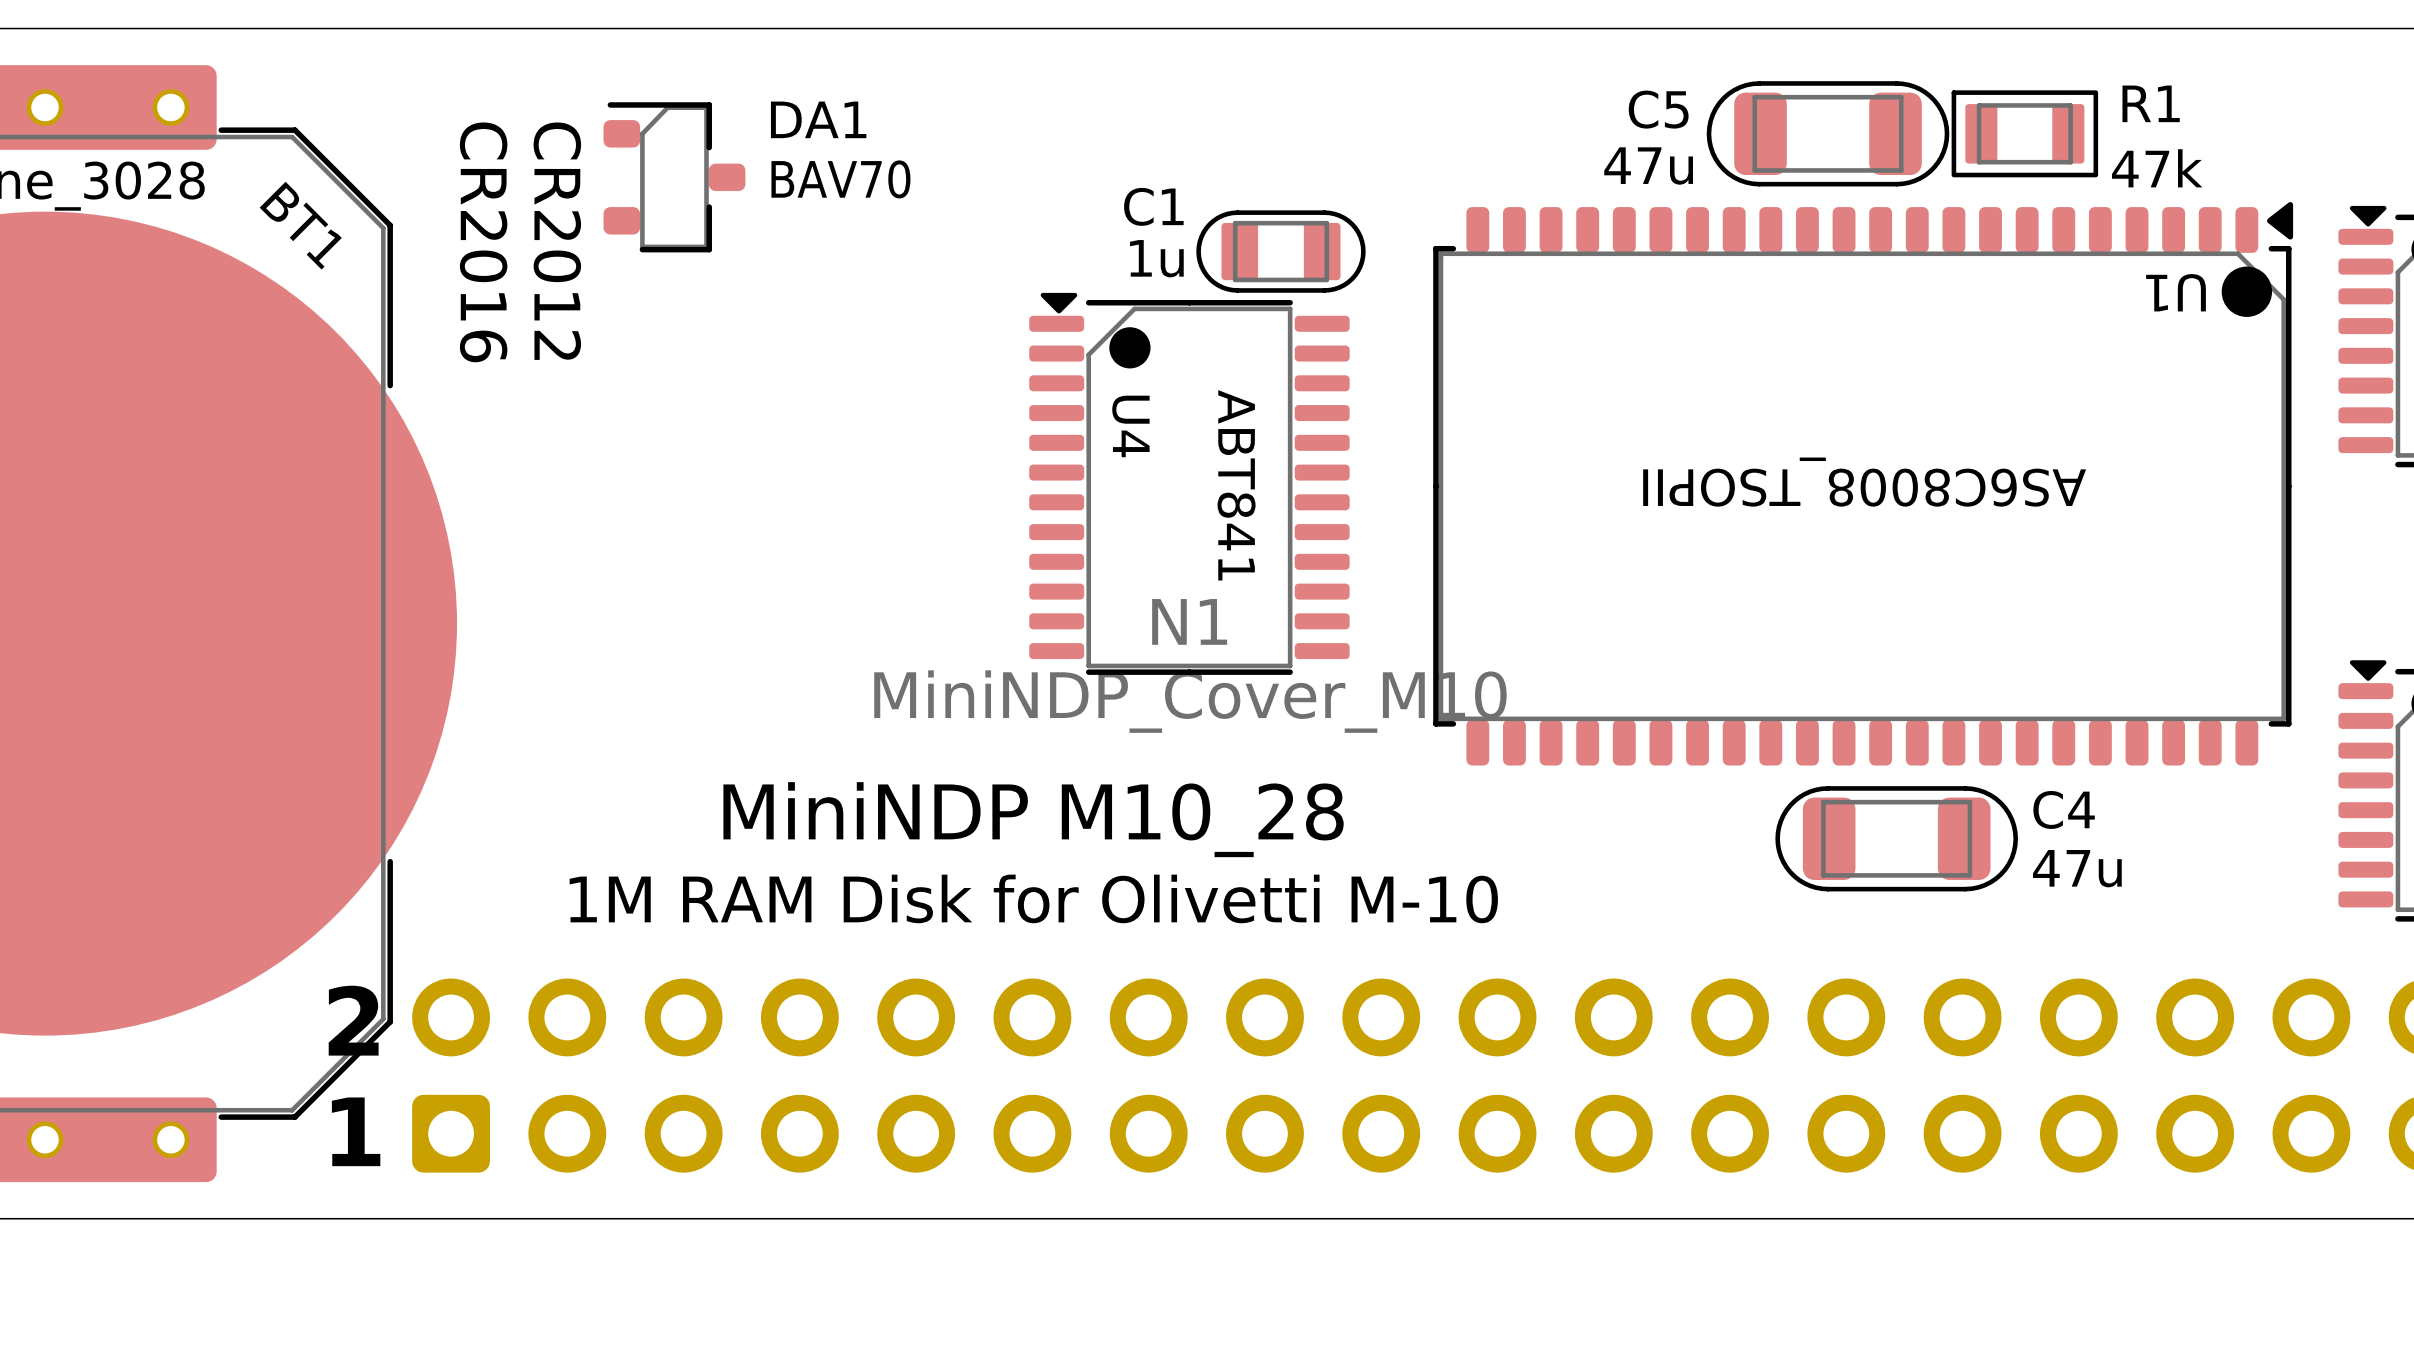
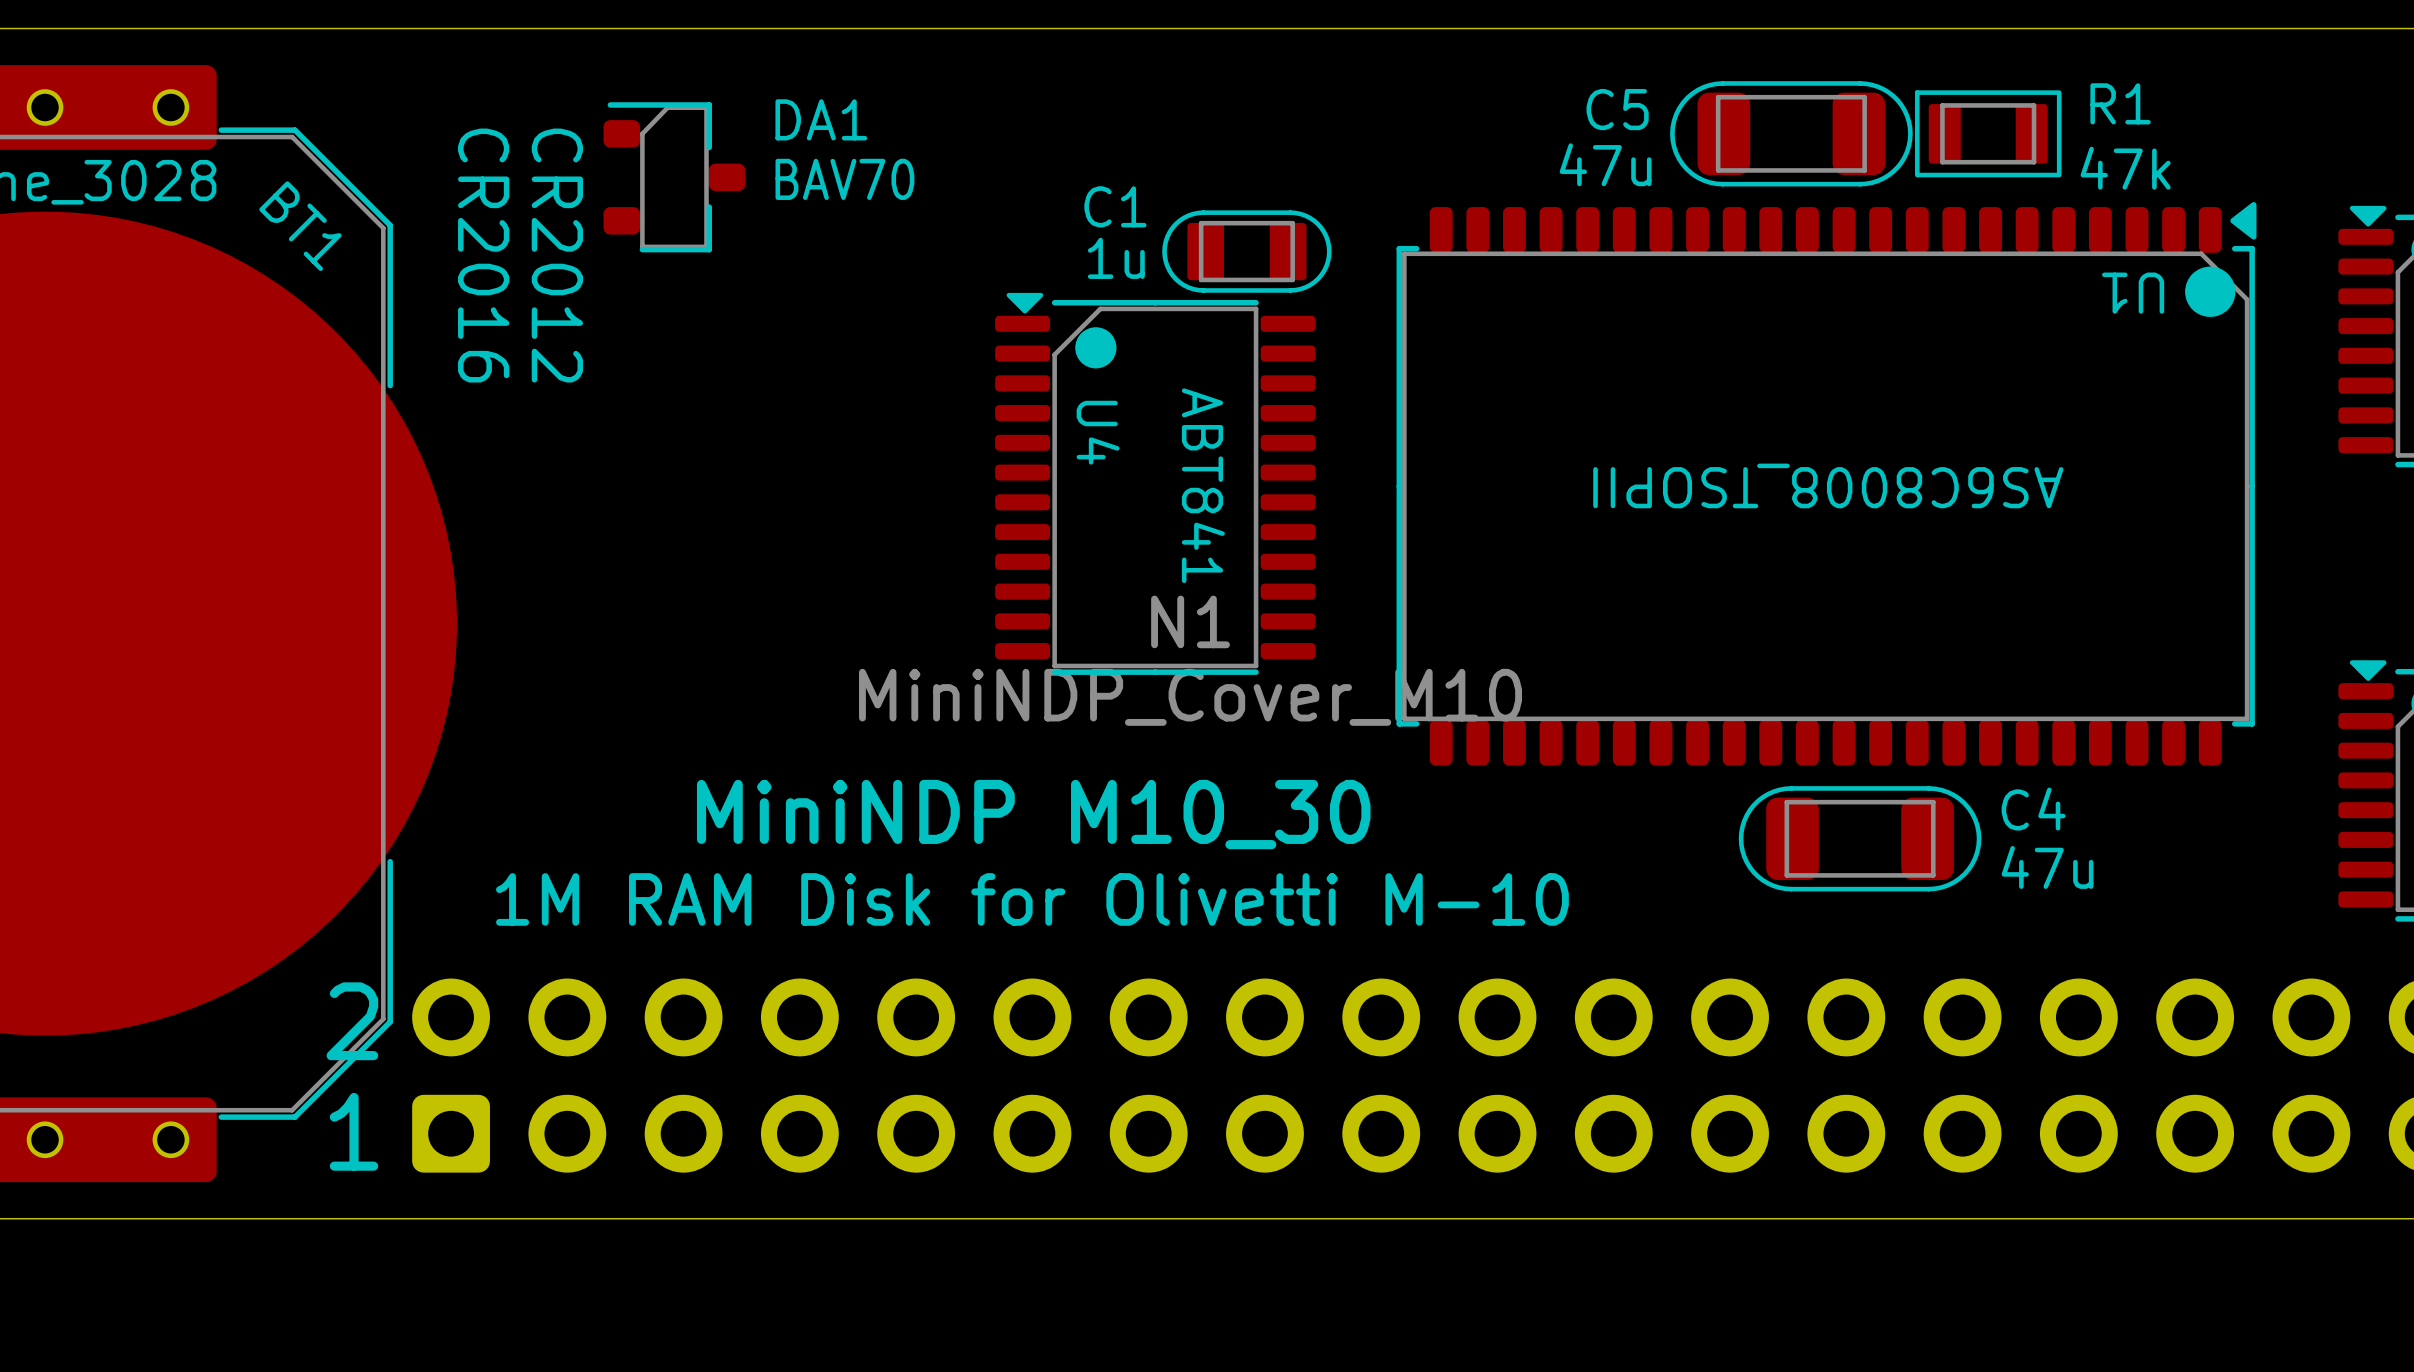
C5 position: (1828, 133) -> (1791, 133)
R1 position: (2024, 133) -> (1988, 133)
C1 position: (1280, 251) -> (1246, 251)
U4 position: (1189, 483) -> (1155, 483)
U1 position: (1863, 483) -> (1826, 483)
text: MiniNDP M10_28 (1033, 819) -> MiniNDP M10_30 (1033, 814)
C4 position: (1896, 838) -> (1860, 838)

